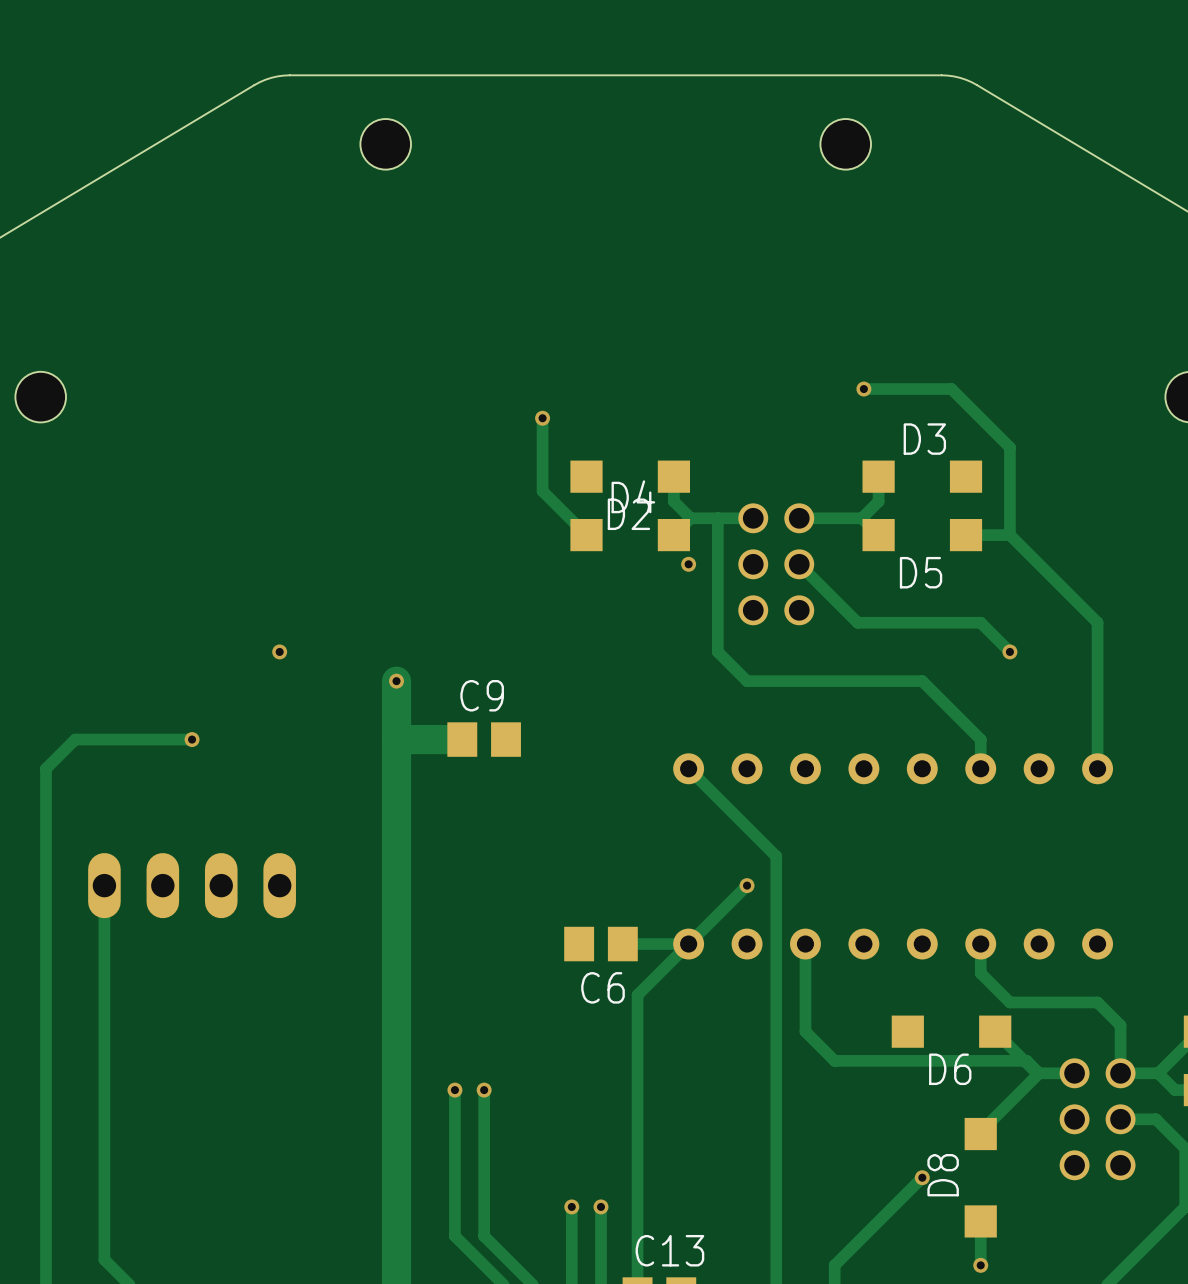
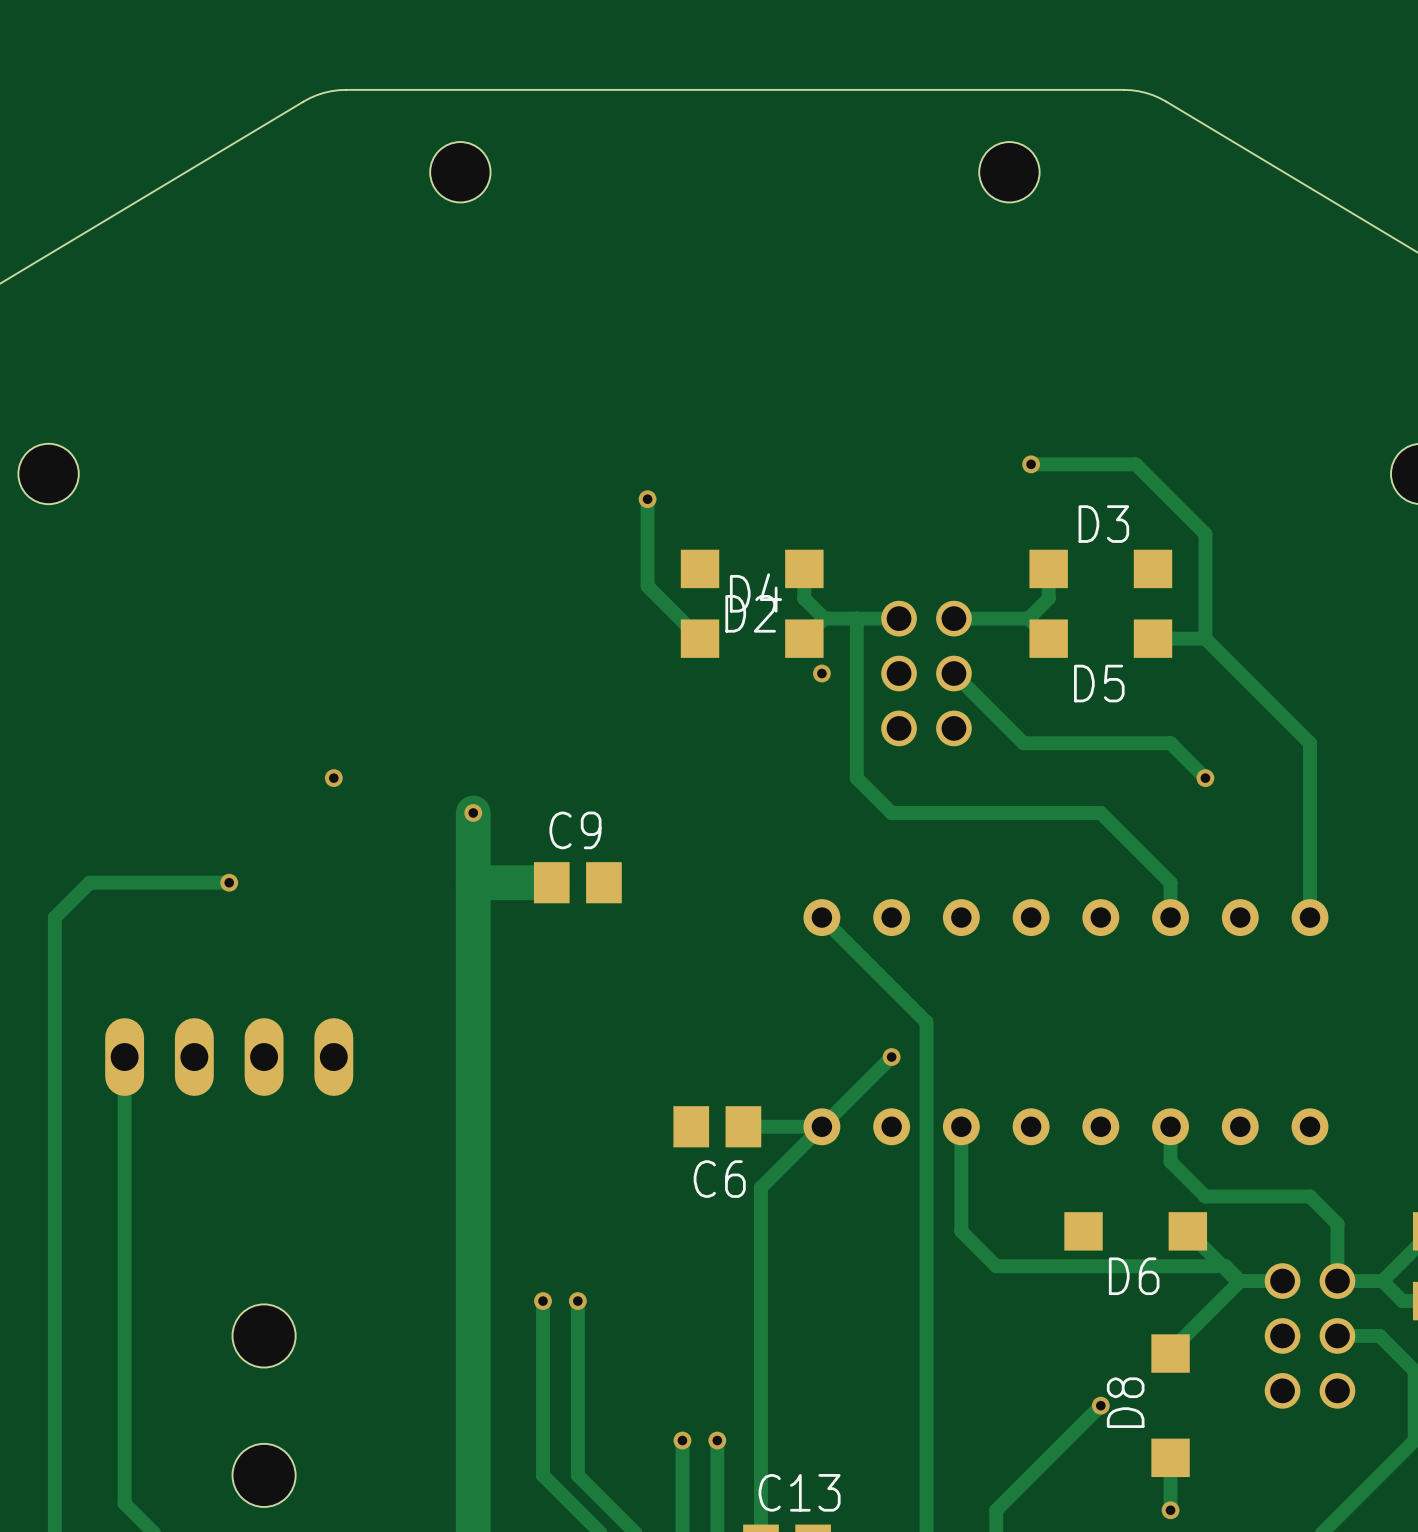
part: none -> (264, 1335)
part: none -> (264, 1475)

